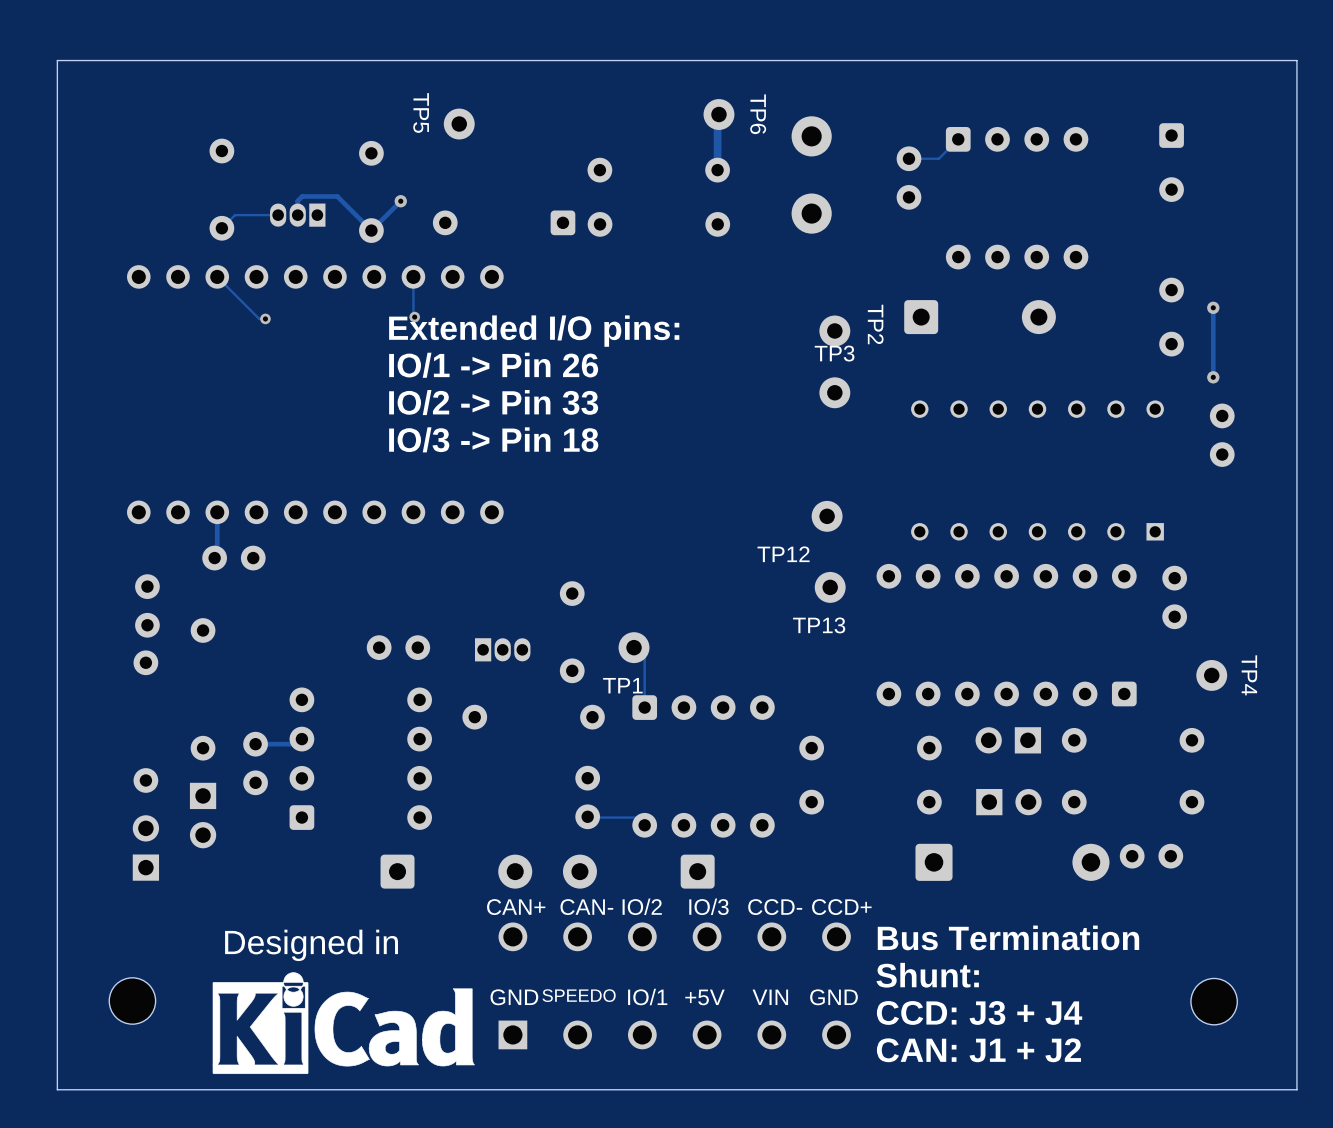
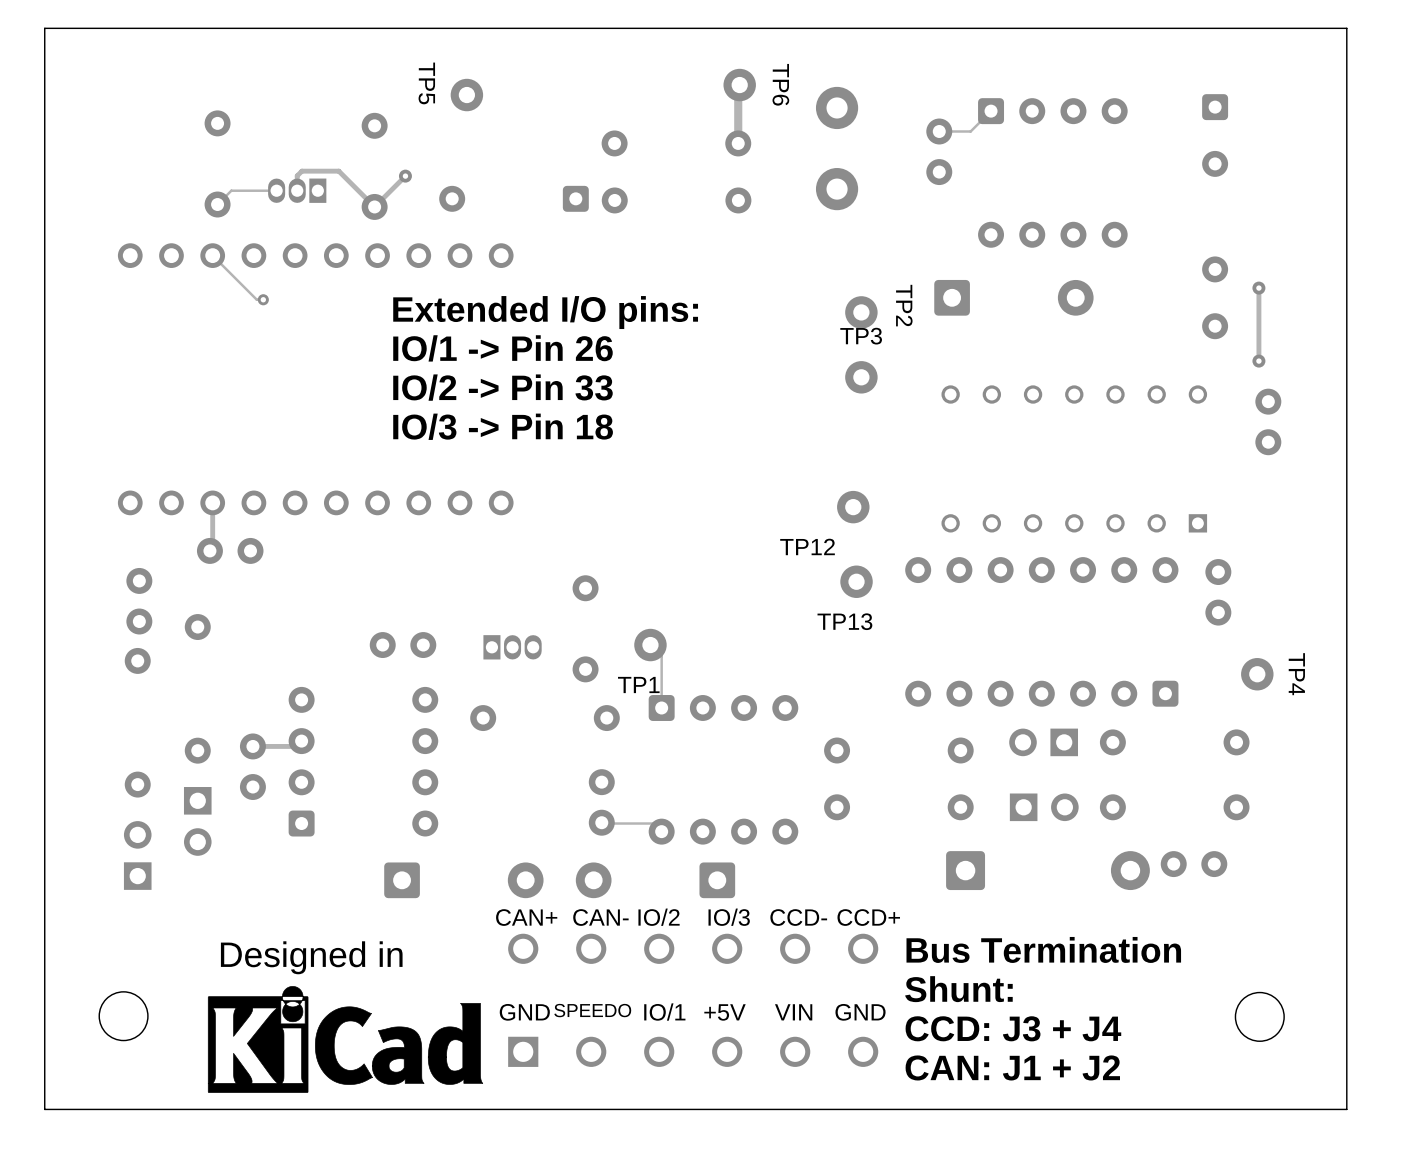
track: (413, 276) (414, 317) -> none
via: (414, 317) -> none

